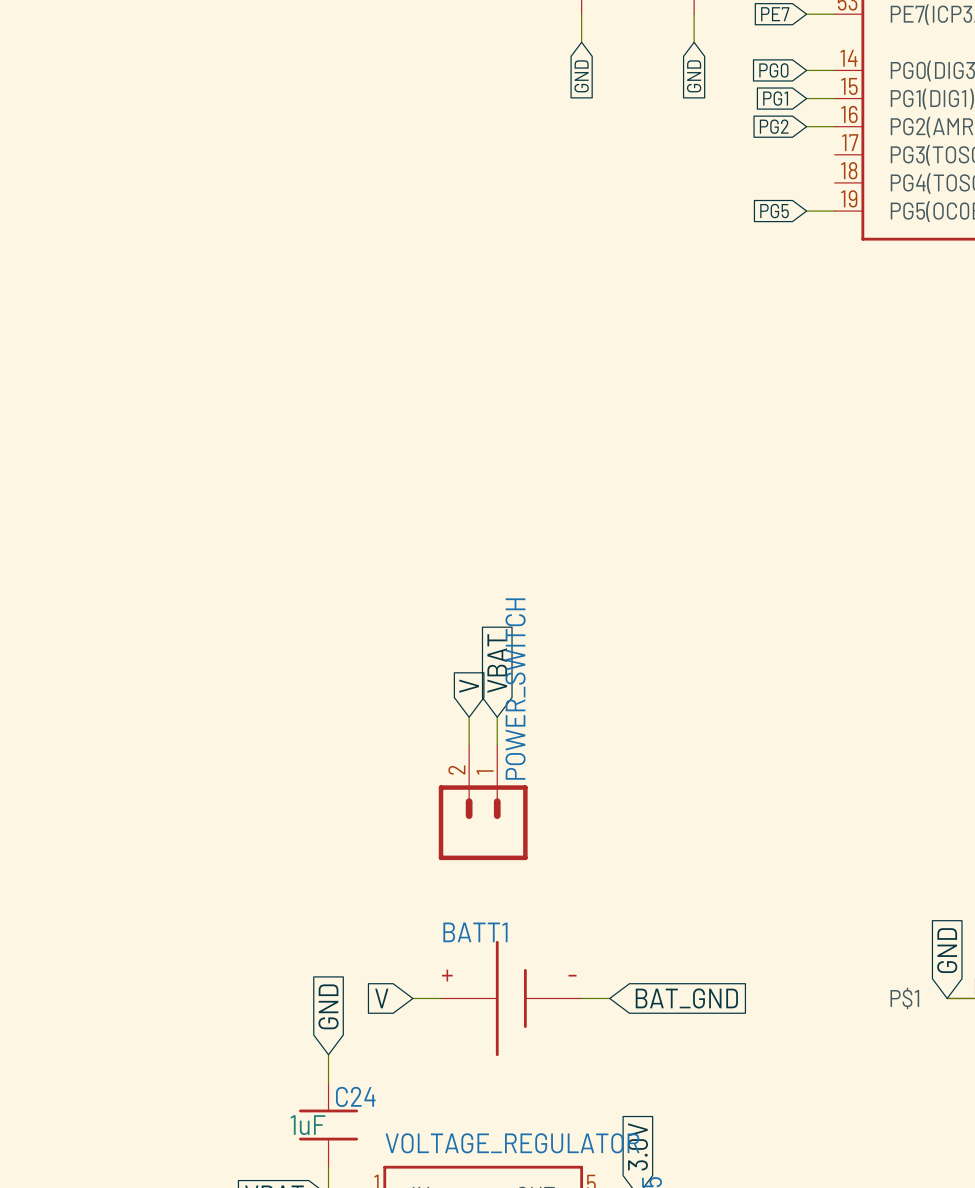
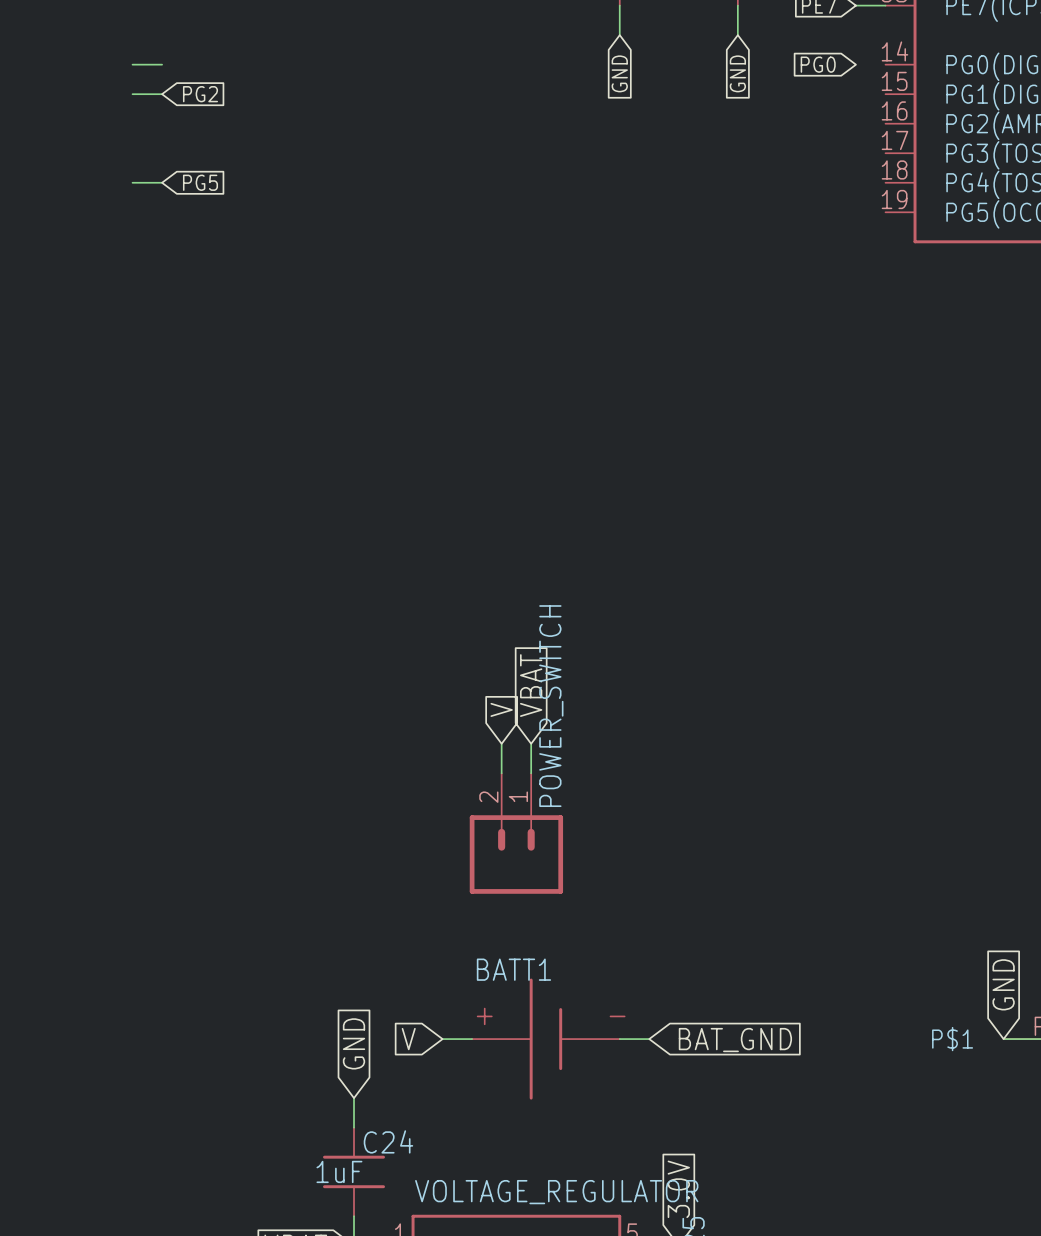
wire: none -> (132, 64) (162, 64)
wire: (806, 70) (834, 70) -> none
wire: none -> (132, 94) (162, 94)
global label: none -> PG2 (200, 94)
global label: PG1 (775, 98) -> none
wire: (806, 98) (834, 98) -> none
global label: PG2 (774, 126) -> none
wire: (806, 126) (834, 126) -> none
wire: none -> (132, 182) (162, 182)
global label: none -> PG5 (200, 182)
global label: PG5 (774, 211) -> none
wire: (806, 211) (834, 211) -> none

